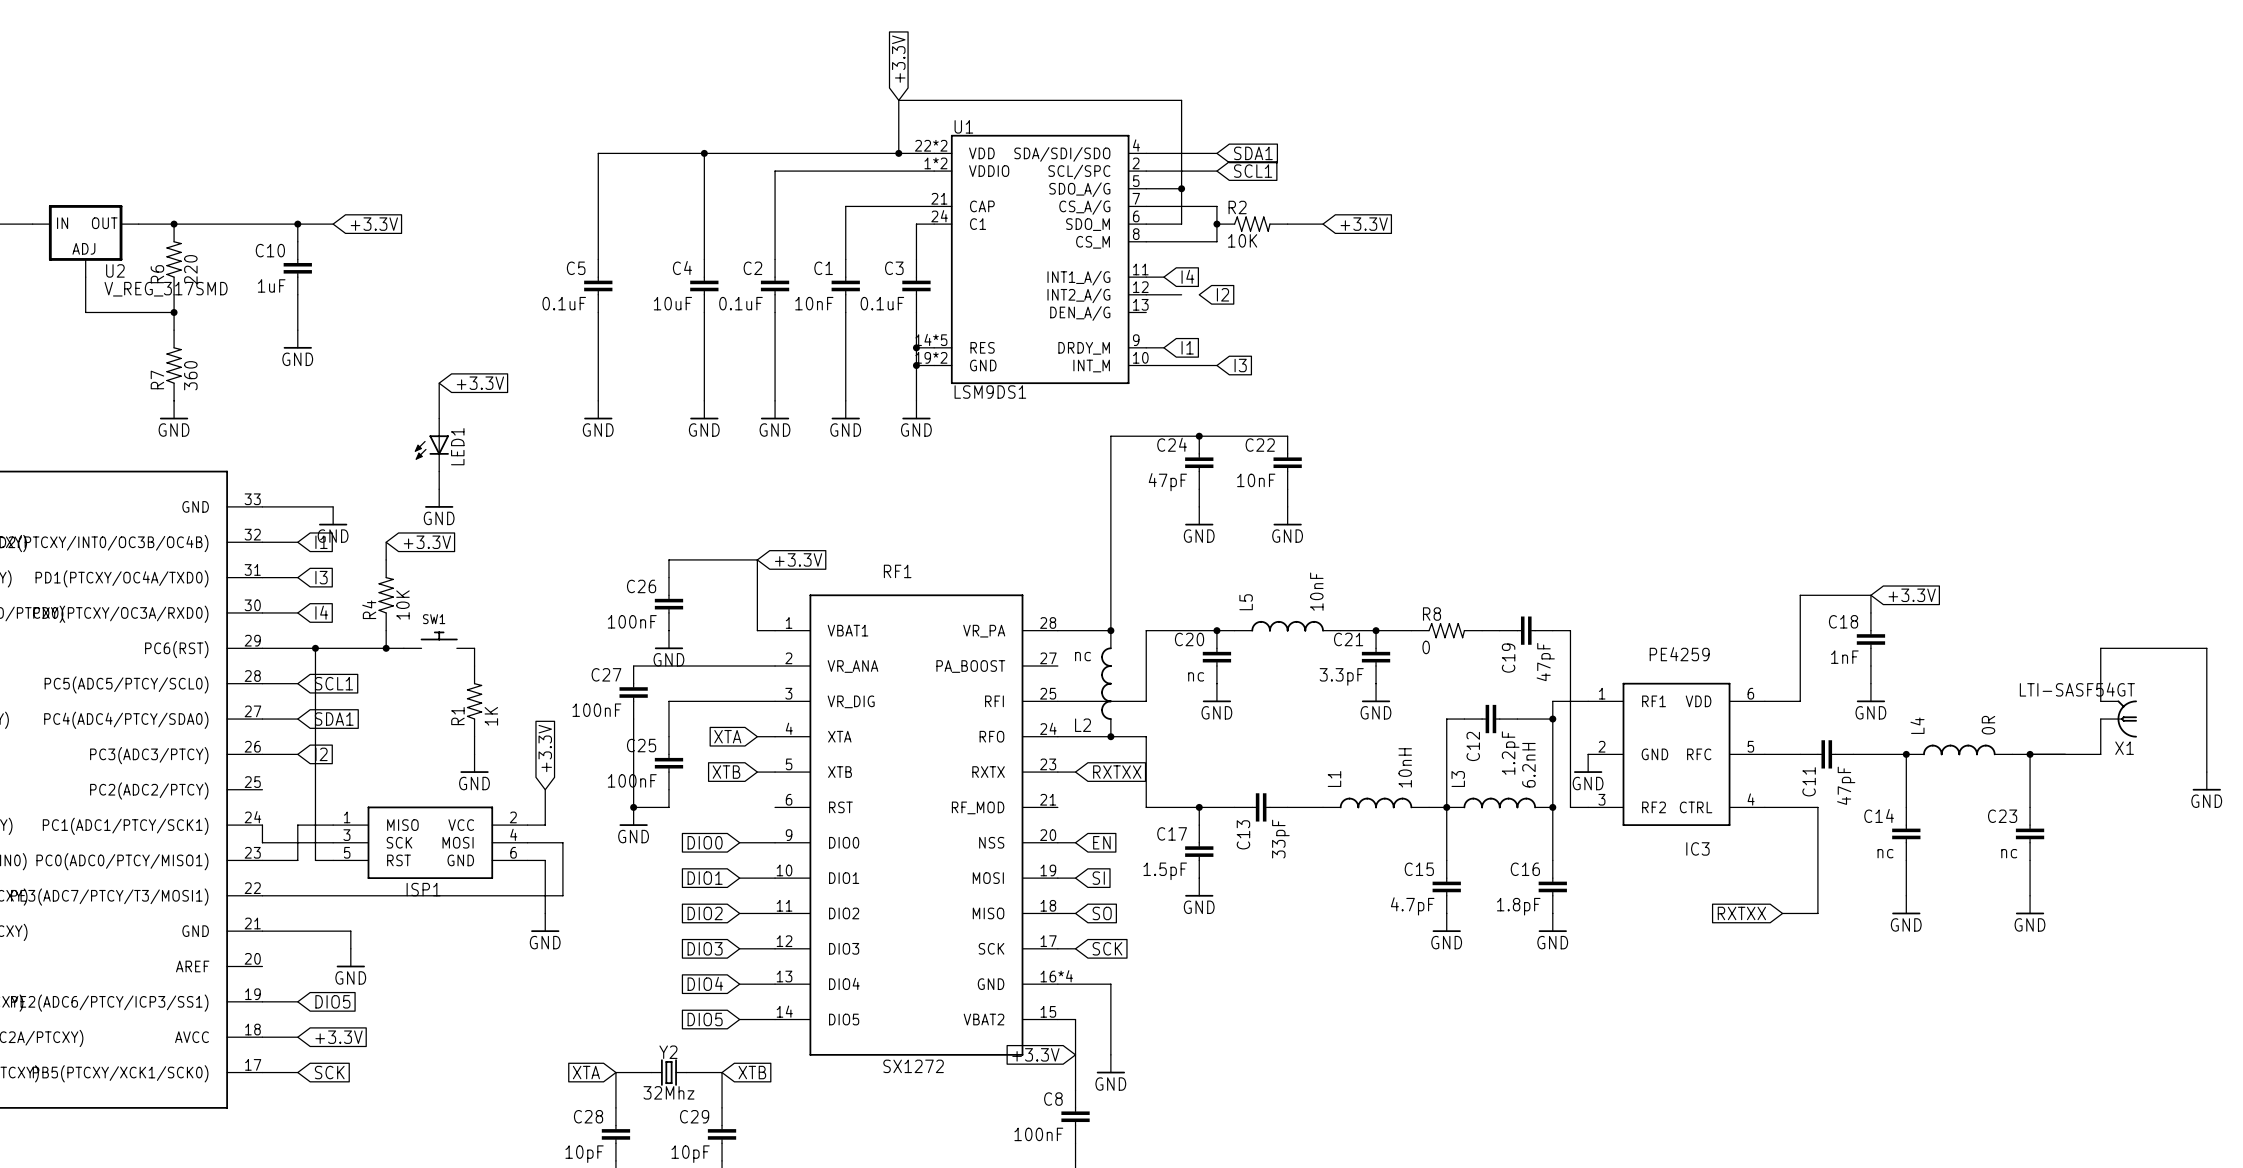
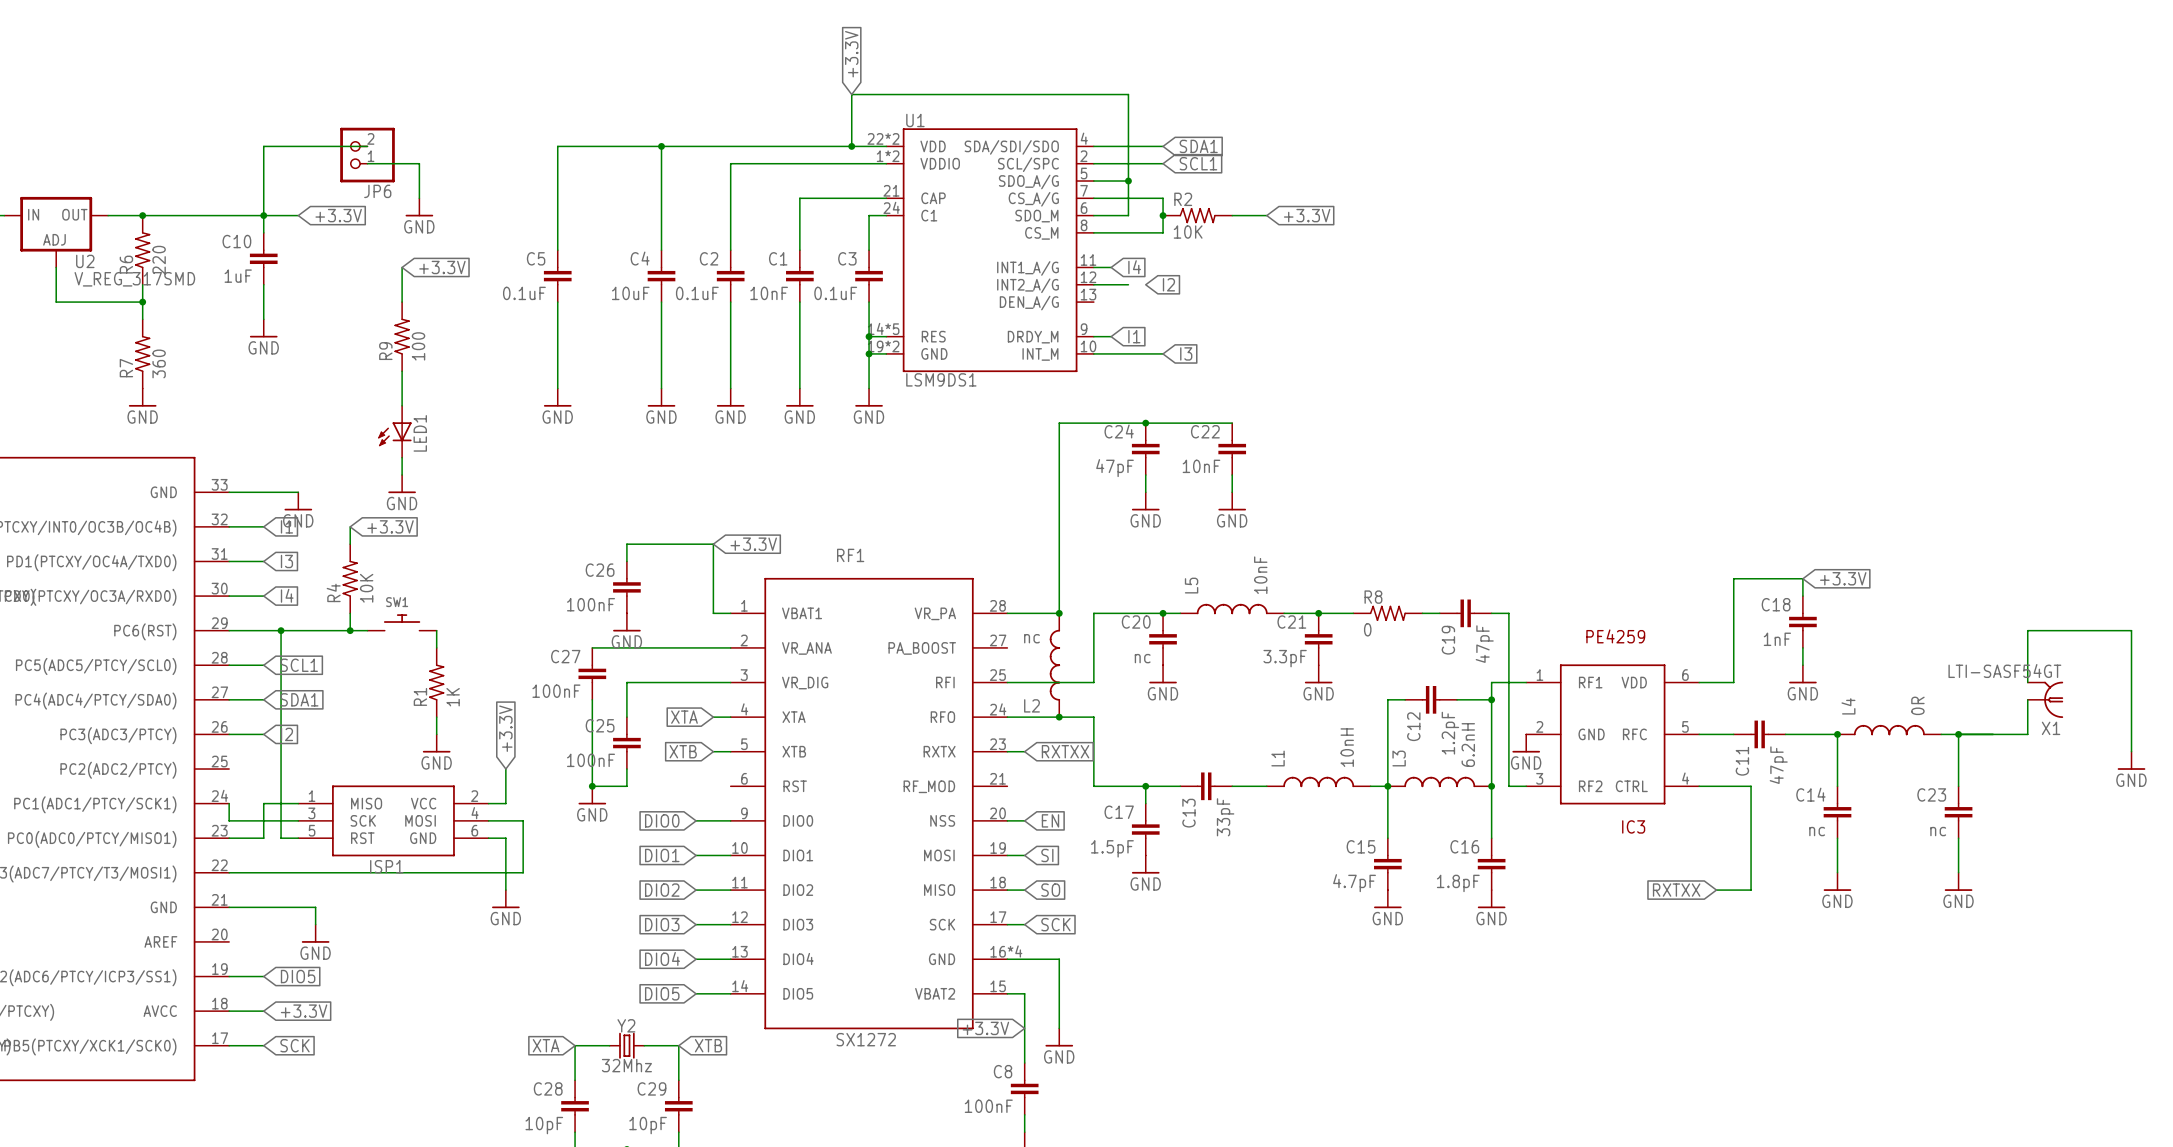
wire: none -> (367, 146) (263, 146) (263, 215)
JP6: none -> (367, 155)
wire: none -> (367, 163) (419, 163) (419, 198)
power symbol: none -> GND (419, 207)
wire: none -> (402, 267) (402, 302)
R9: none -> 100 (402, 336)
global label position: +3.3V (480, 383) -> +3.3V (442, 267)

